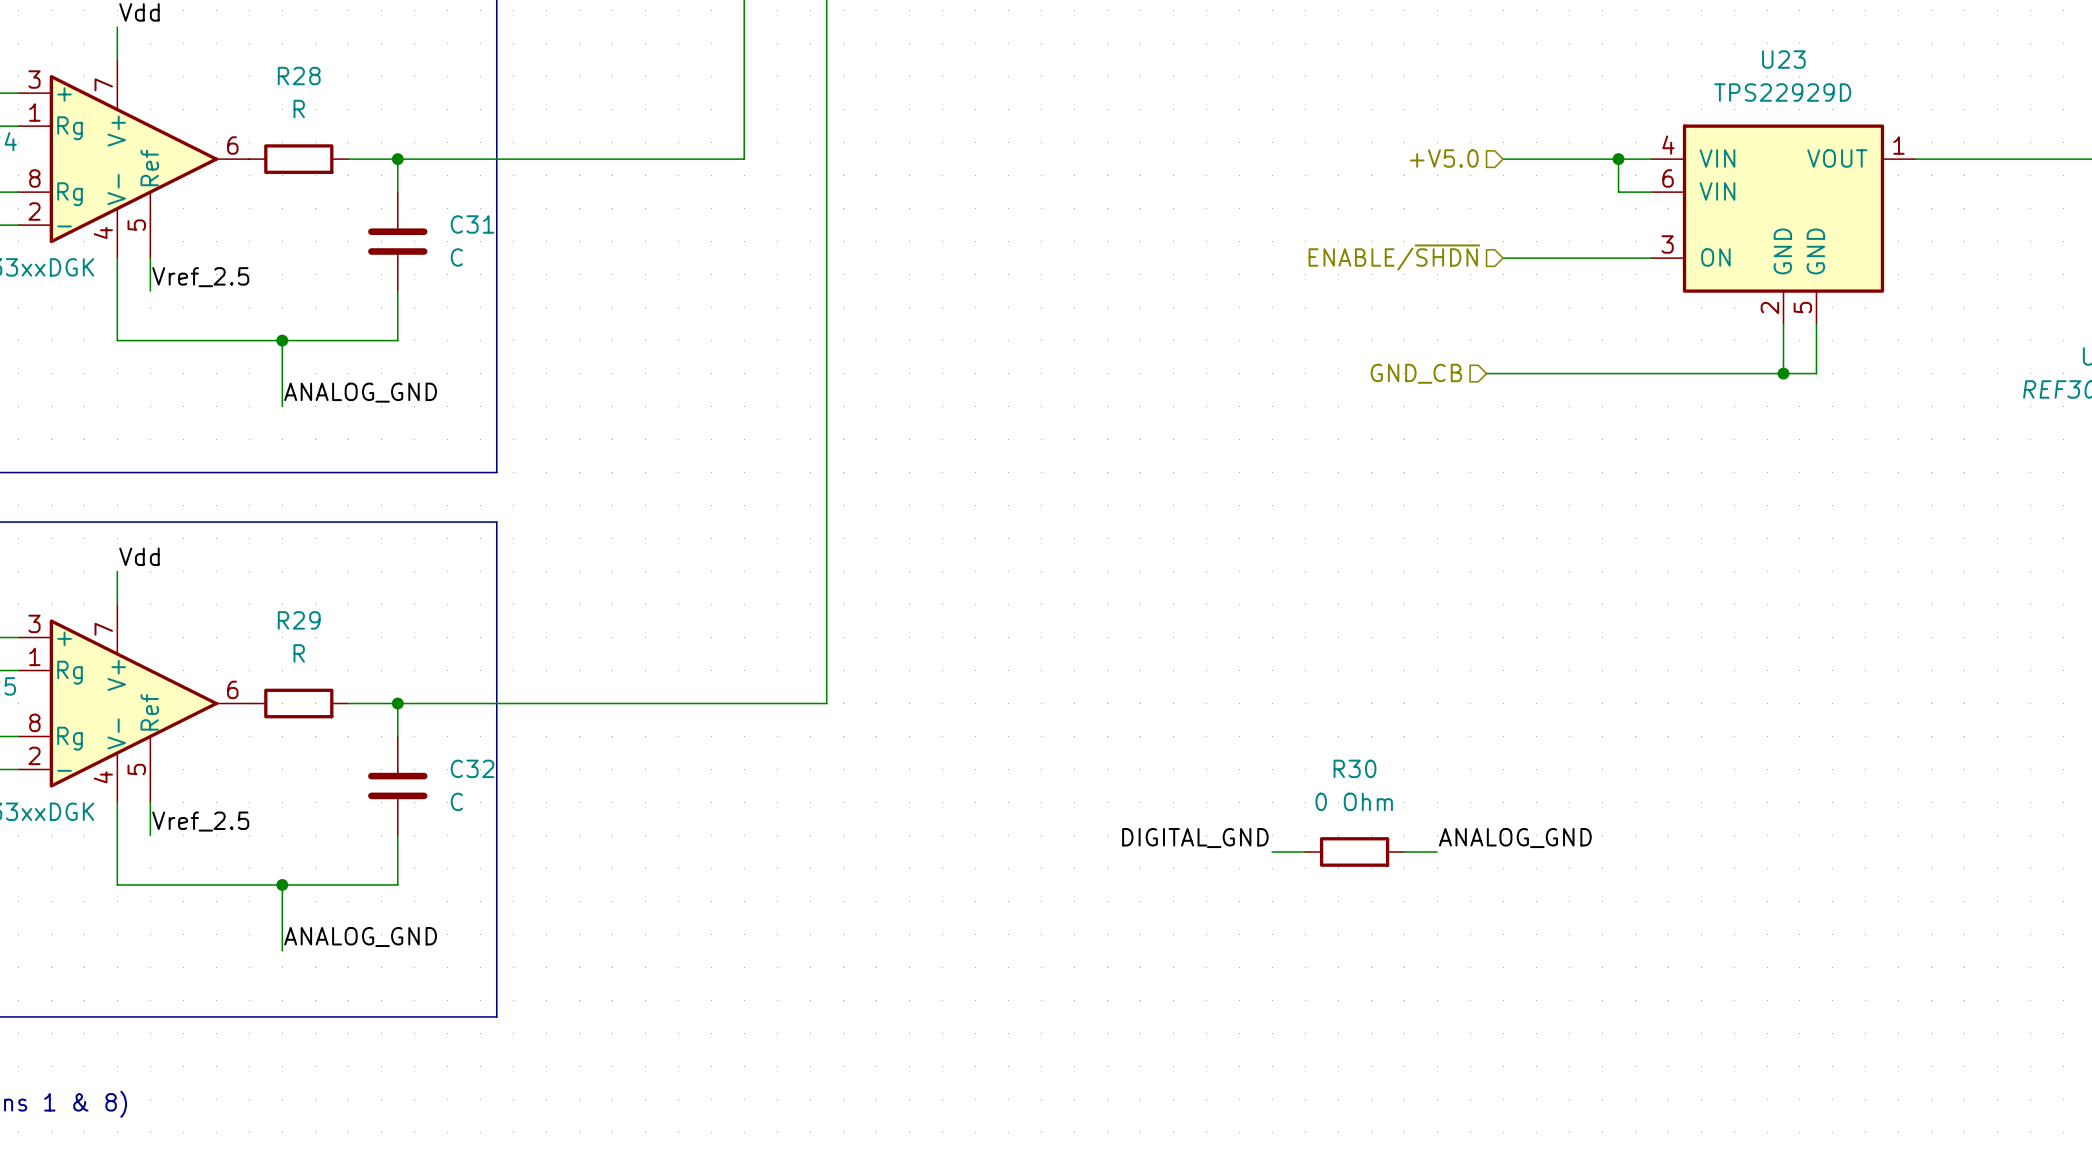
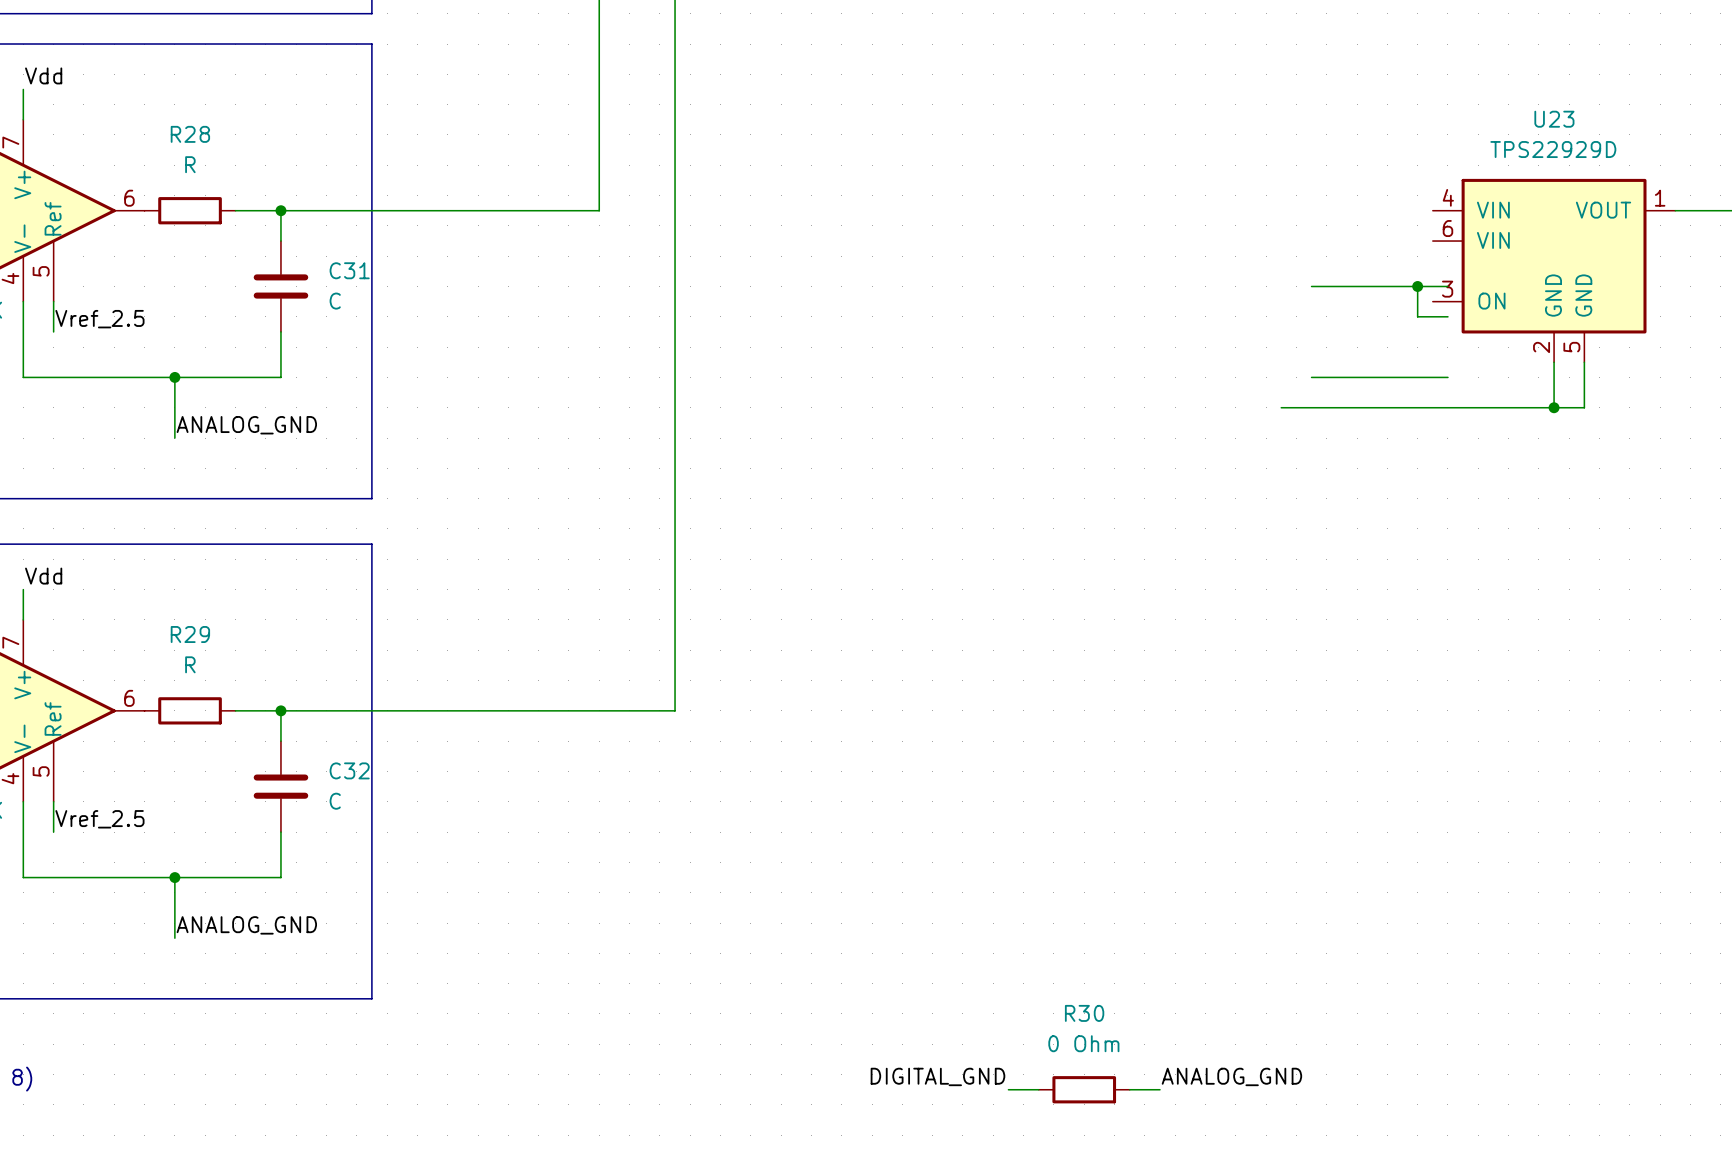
hierarchical label: +V5.0 (1444, 158) -> none
wire: (1503, 159) (1651, 159) -> (1311, 286) (1447, 286)
wire: (1618, 159) (1618, 192) (1651, 192) -> (1417, 286) (1417, 316) (1447, 316)
junction: (1618, 159) -> none
junction: none -> (1417, 286)
hierarchical label: ENABLE/~{SHDN} (1394, 257) -> none
wire: (1503, 258) (1651, 258) -> (1311, 377) (1447, 377)
hierarchical label: GND_CB (1416, 373) -> none
label position: DIGITAL_GND (1195, 838) -> DIGITAL_GND (937, 1076)
label position: ANALOG_GND (1515, 838) -> ANALOG_GND (1231, 1076)
wire: (1272, 851) (1305, 851) -> (1008, 1089) (1038, 1089)
R30 position: (1354, 851) -> (1084, 1089)
wire: (1404, 851) (1437, 851) -> (1129, 1089) (1160, 1089)

